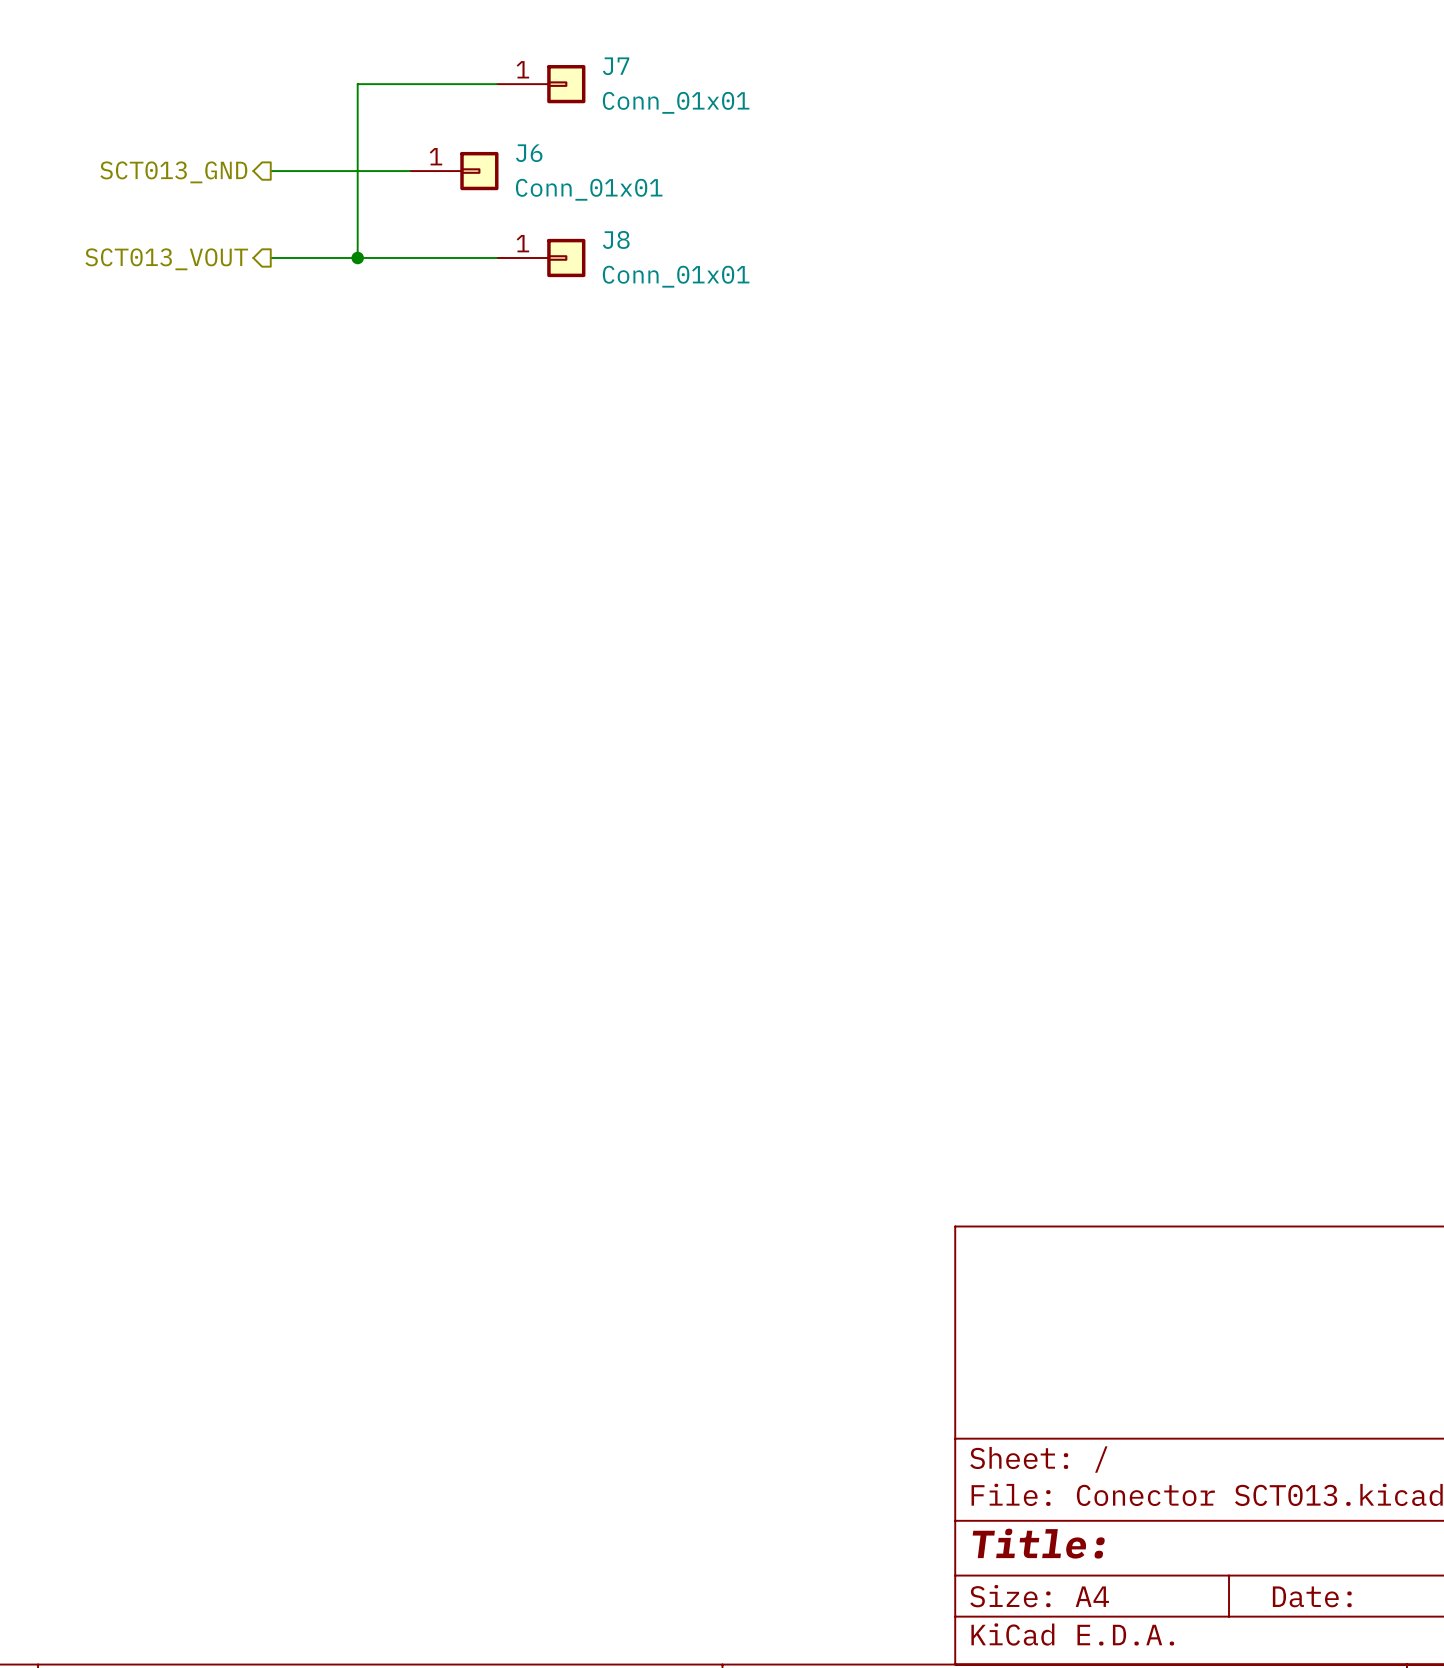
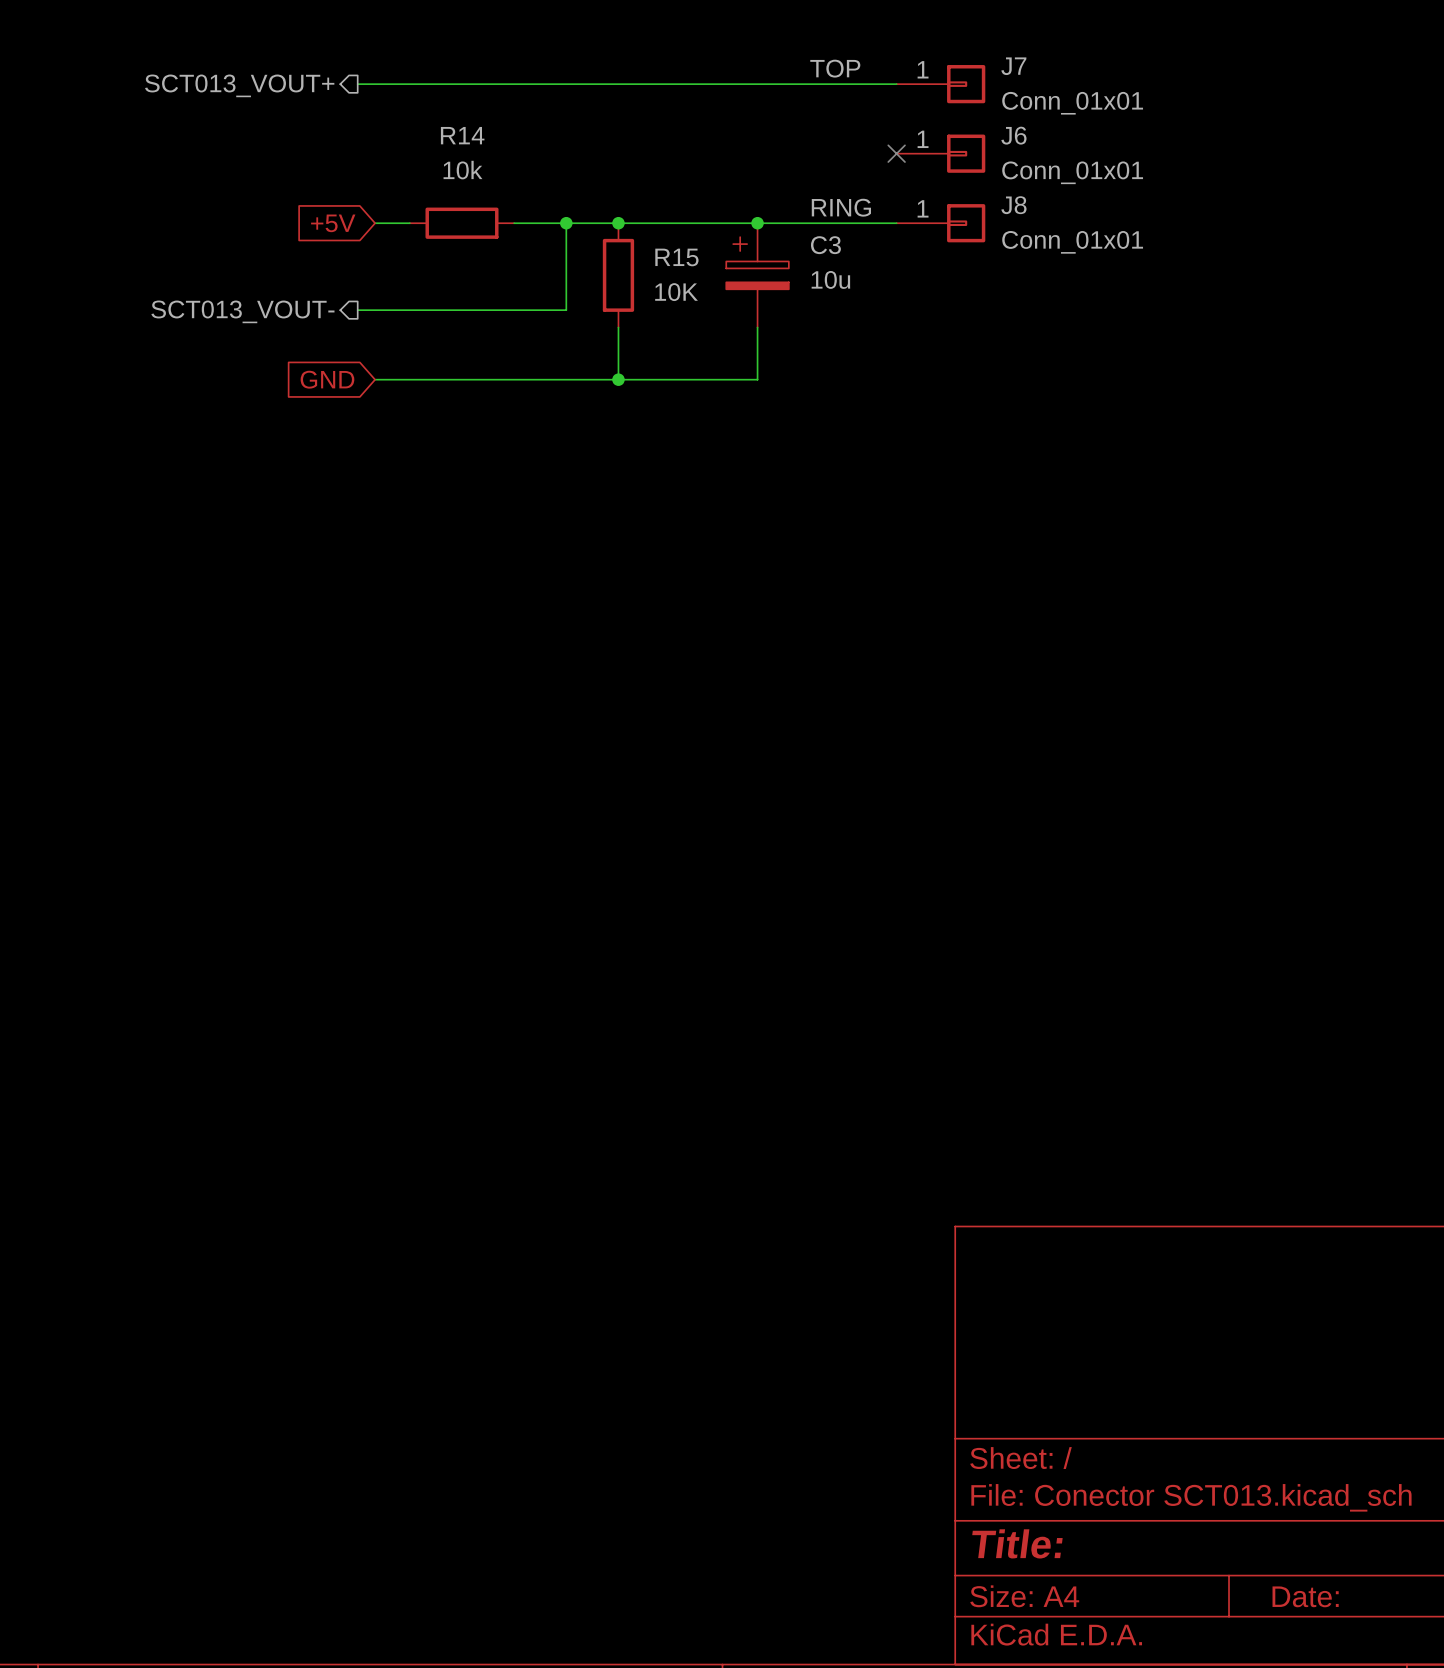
label: none -> TOP (835, 68)
wire: (357, 84) (357, 257) -> none
wire: none -> (496, 84) (896, 84)
J7 position: (541, 84) -> (940, 84)
hierarchical label: none -> SCT013_VOUT+ (239, 85)
no-connect mark: none -> (896, 153)
wire: (270, 171) (409, 171) -> none
J6 position: (454, 171) -> (940, 153)
hierarchical label: SCT013_GND (173, 172) -> none
label: none -> RING (841, 207)
global label: none -> +5V (333, 223)
wire: none -> (375, 223) (409, 223)
R14: none -> 10k (462, 223)
wire: none -> (514, 223) (896, 223)
wire: none -> (566, 223) (566, 310) (357, 310)
junction: none -> (566, 223)
junction: none -> (618, 223)
junction: none -> (757, 223)
wire: (270, 257) (496, 257) -> none
junction: (357, 257) -> none
J8 position: (541, 257) -> (940, 223)
hierarchical label: SCT013_VOUT (166, 259) -> none
R15: none -> 10K (618, 275)
C3: none -> 10u (757, 275)
hierarchical label: none -> SCT013_VOUT- (242, 311)
wire: none -> (618, 327) (618, 379)
wire: none -> (757, 327) (757, 379) (375, 379)
global label: none -> GND (327, 379)
junction: none -> (618, 379)

